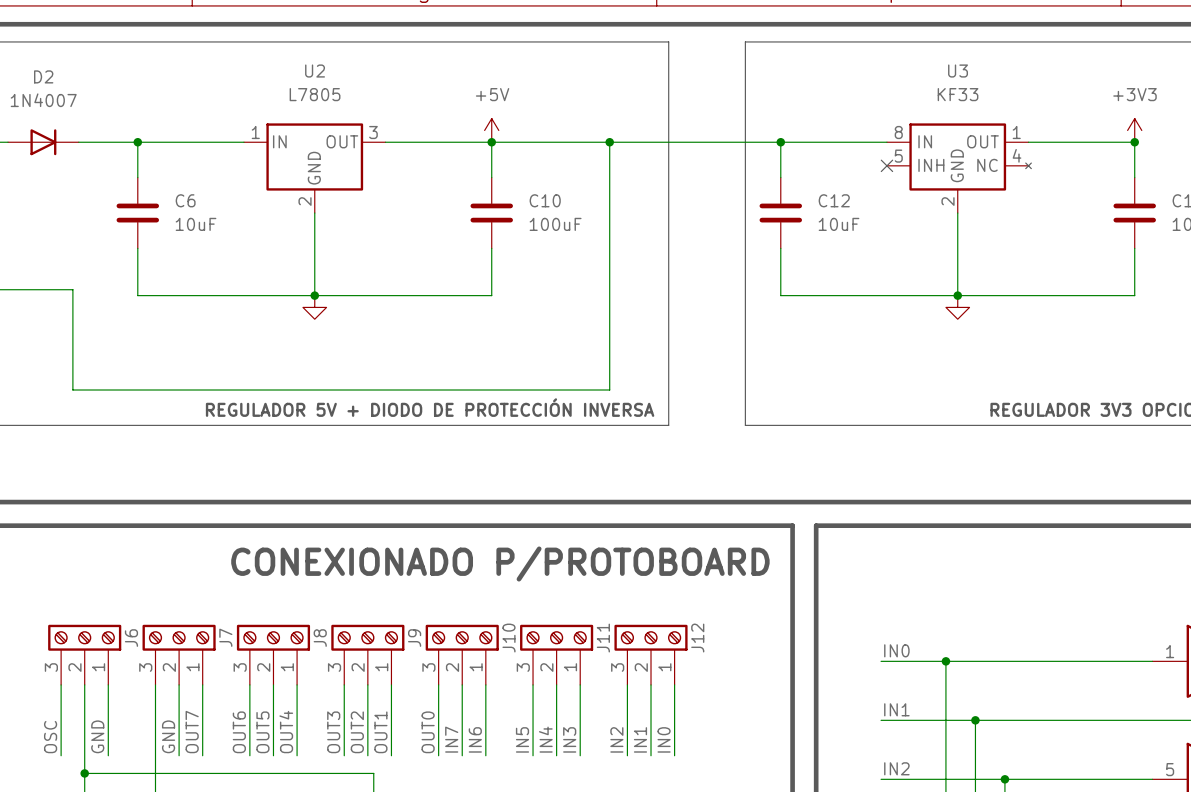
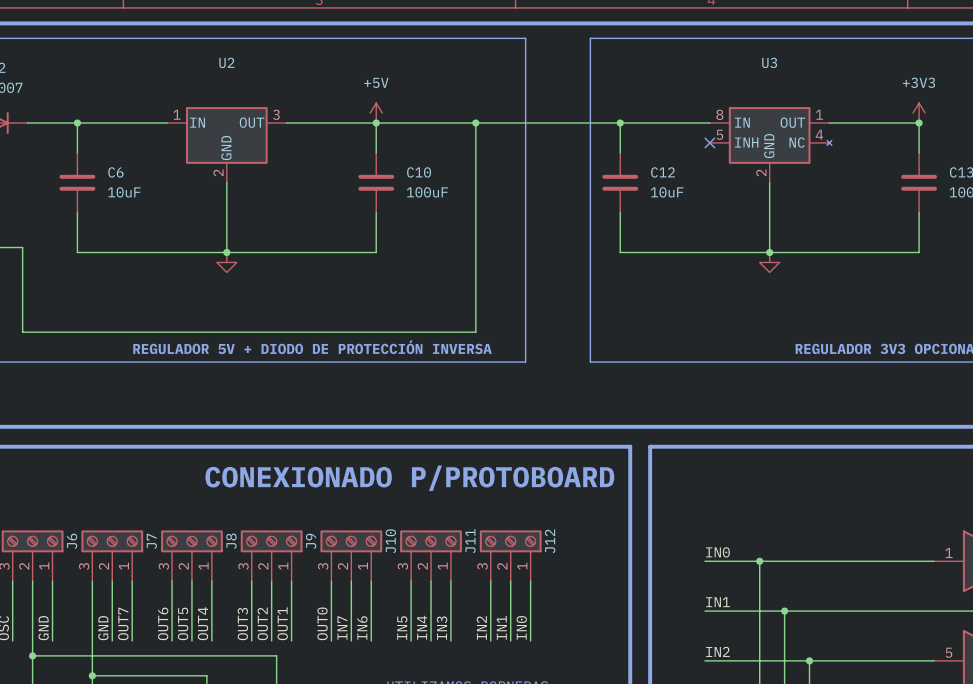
U2 value: L7805 (315, 94) -> none
U3 value: KF33 (958, 94) -> none

